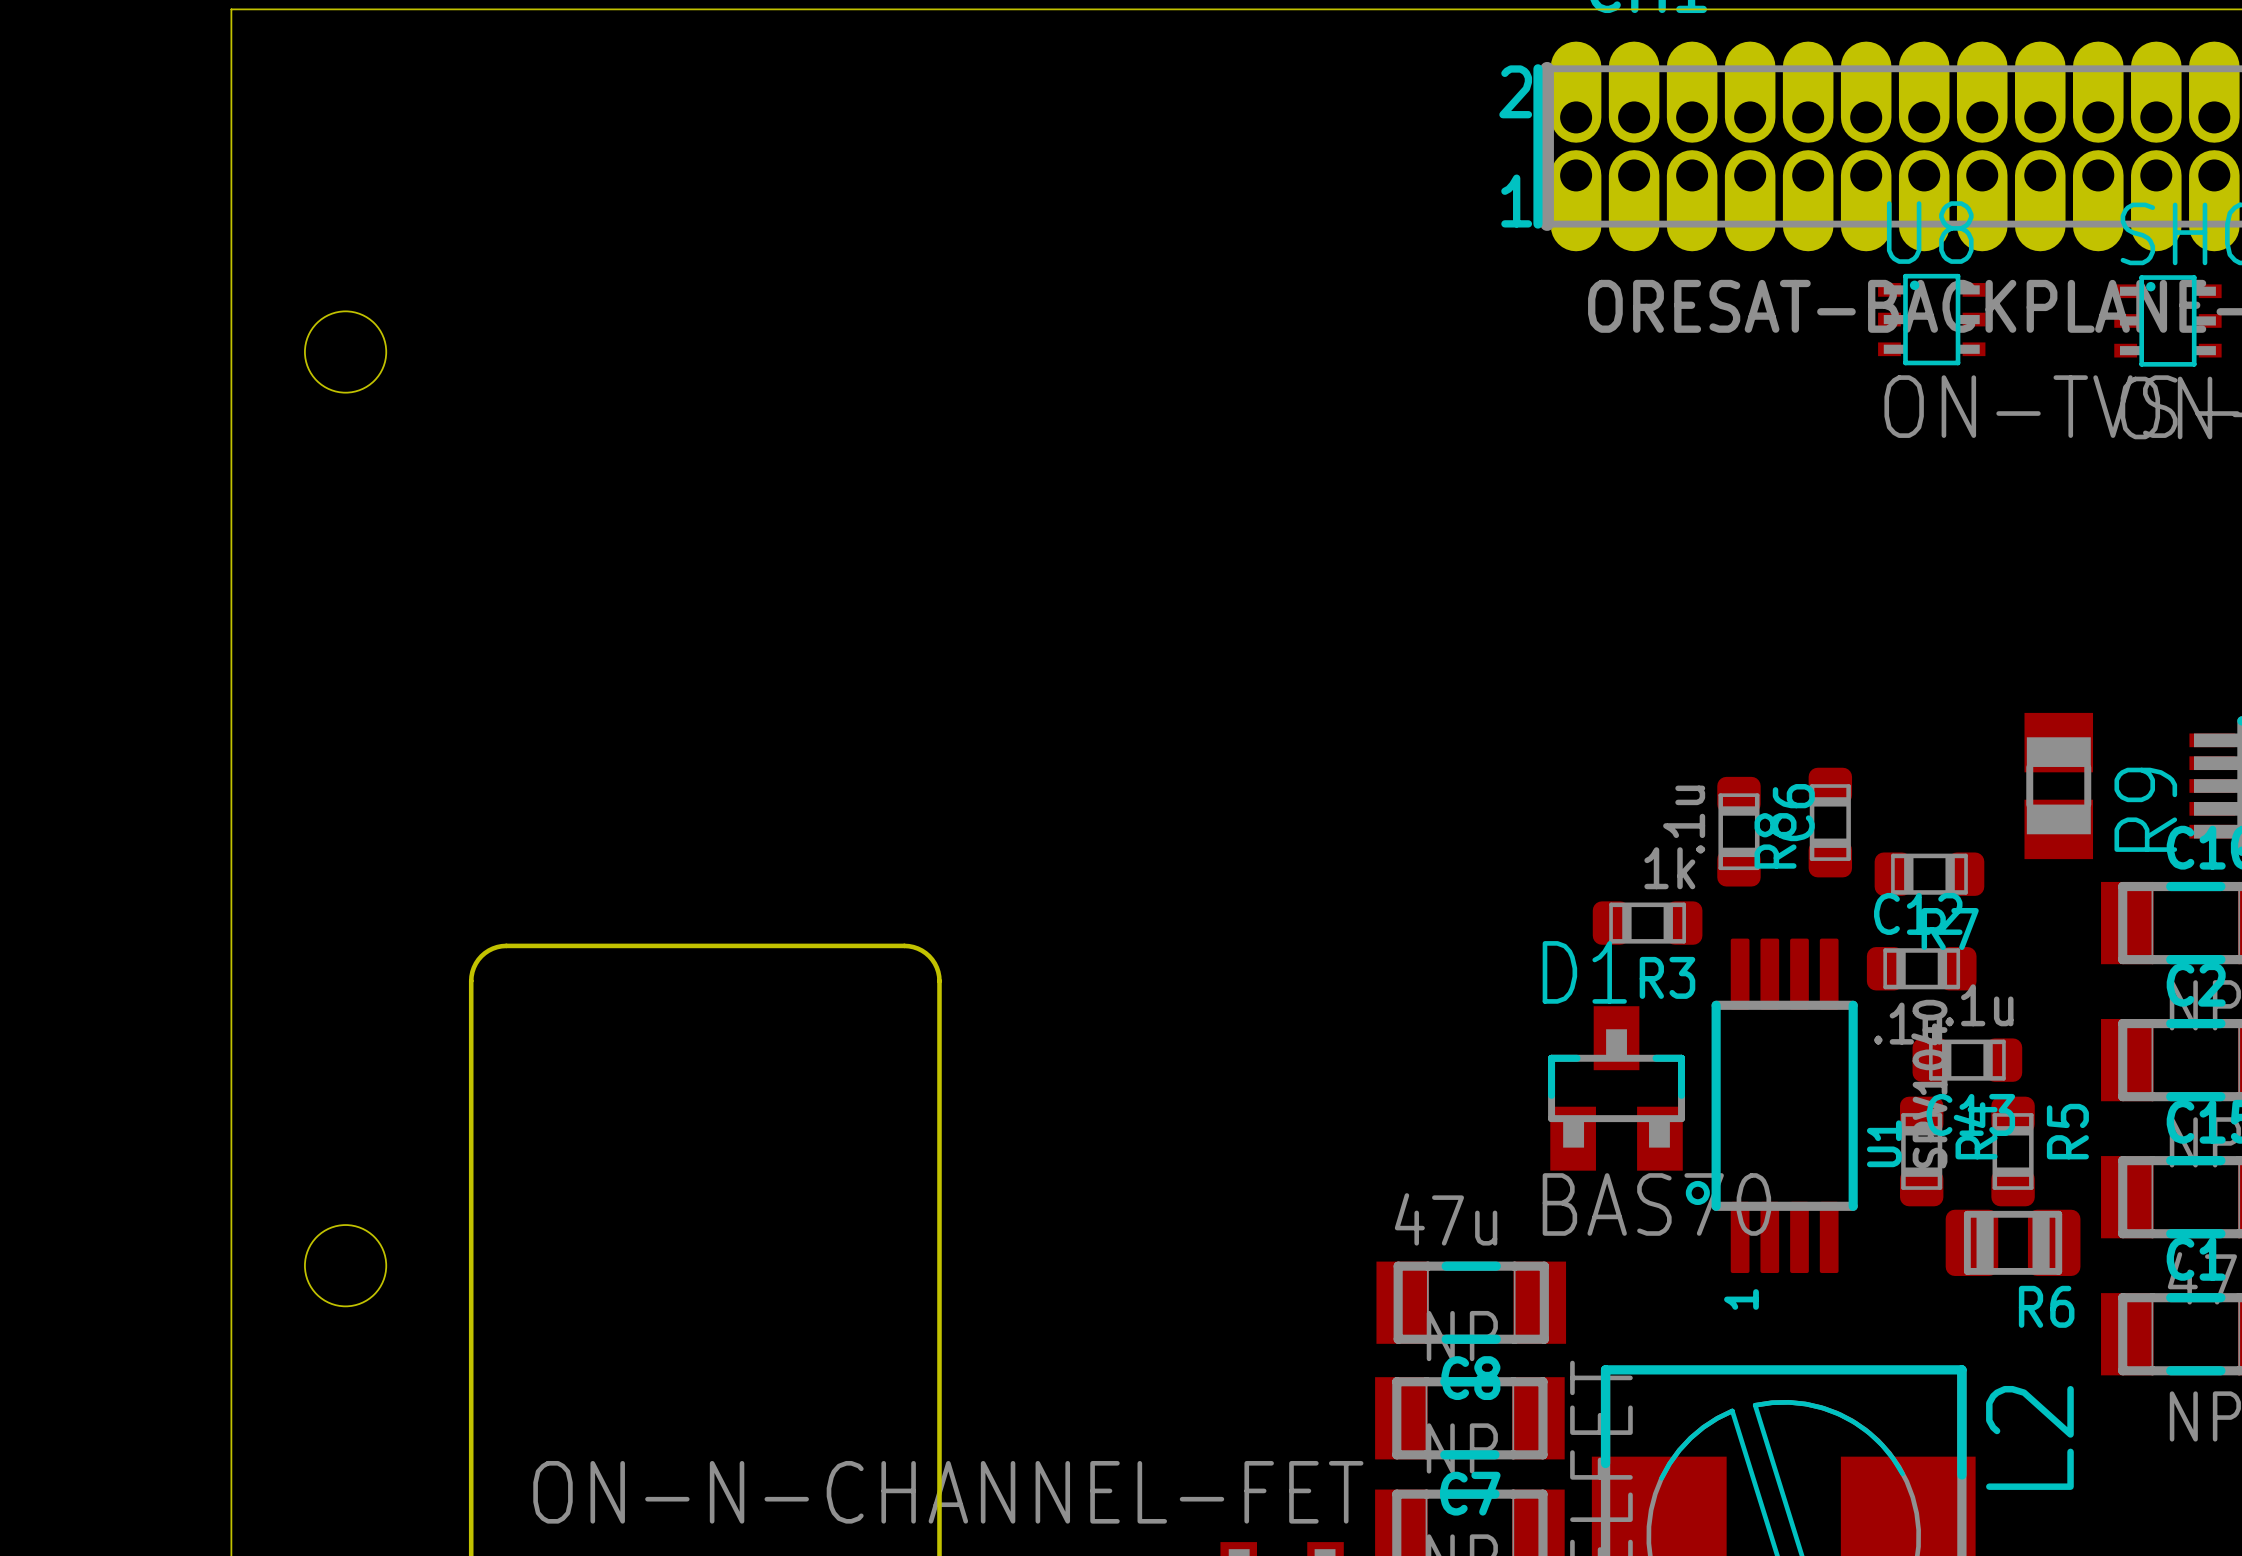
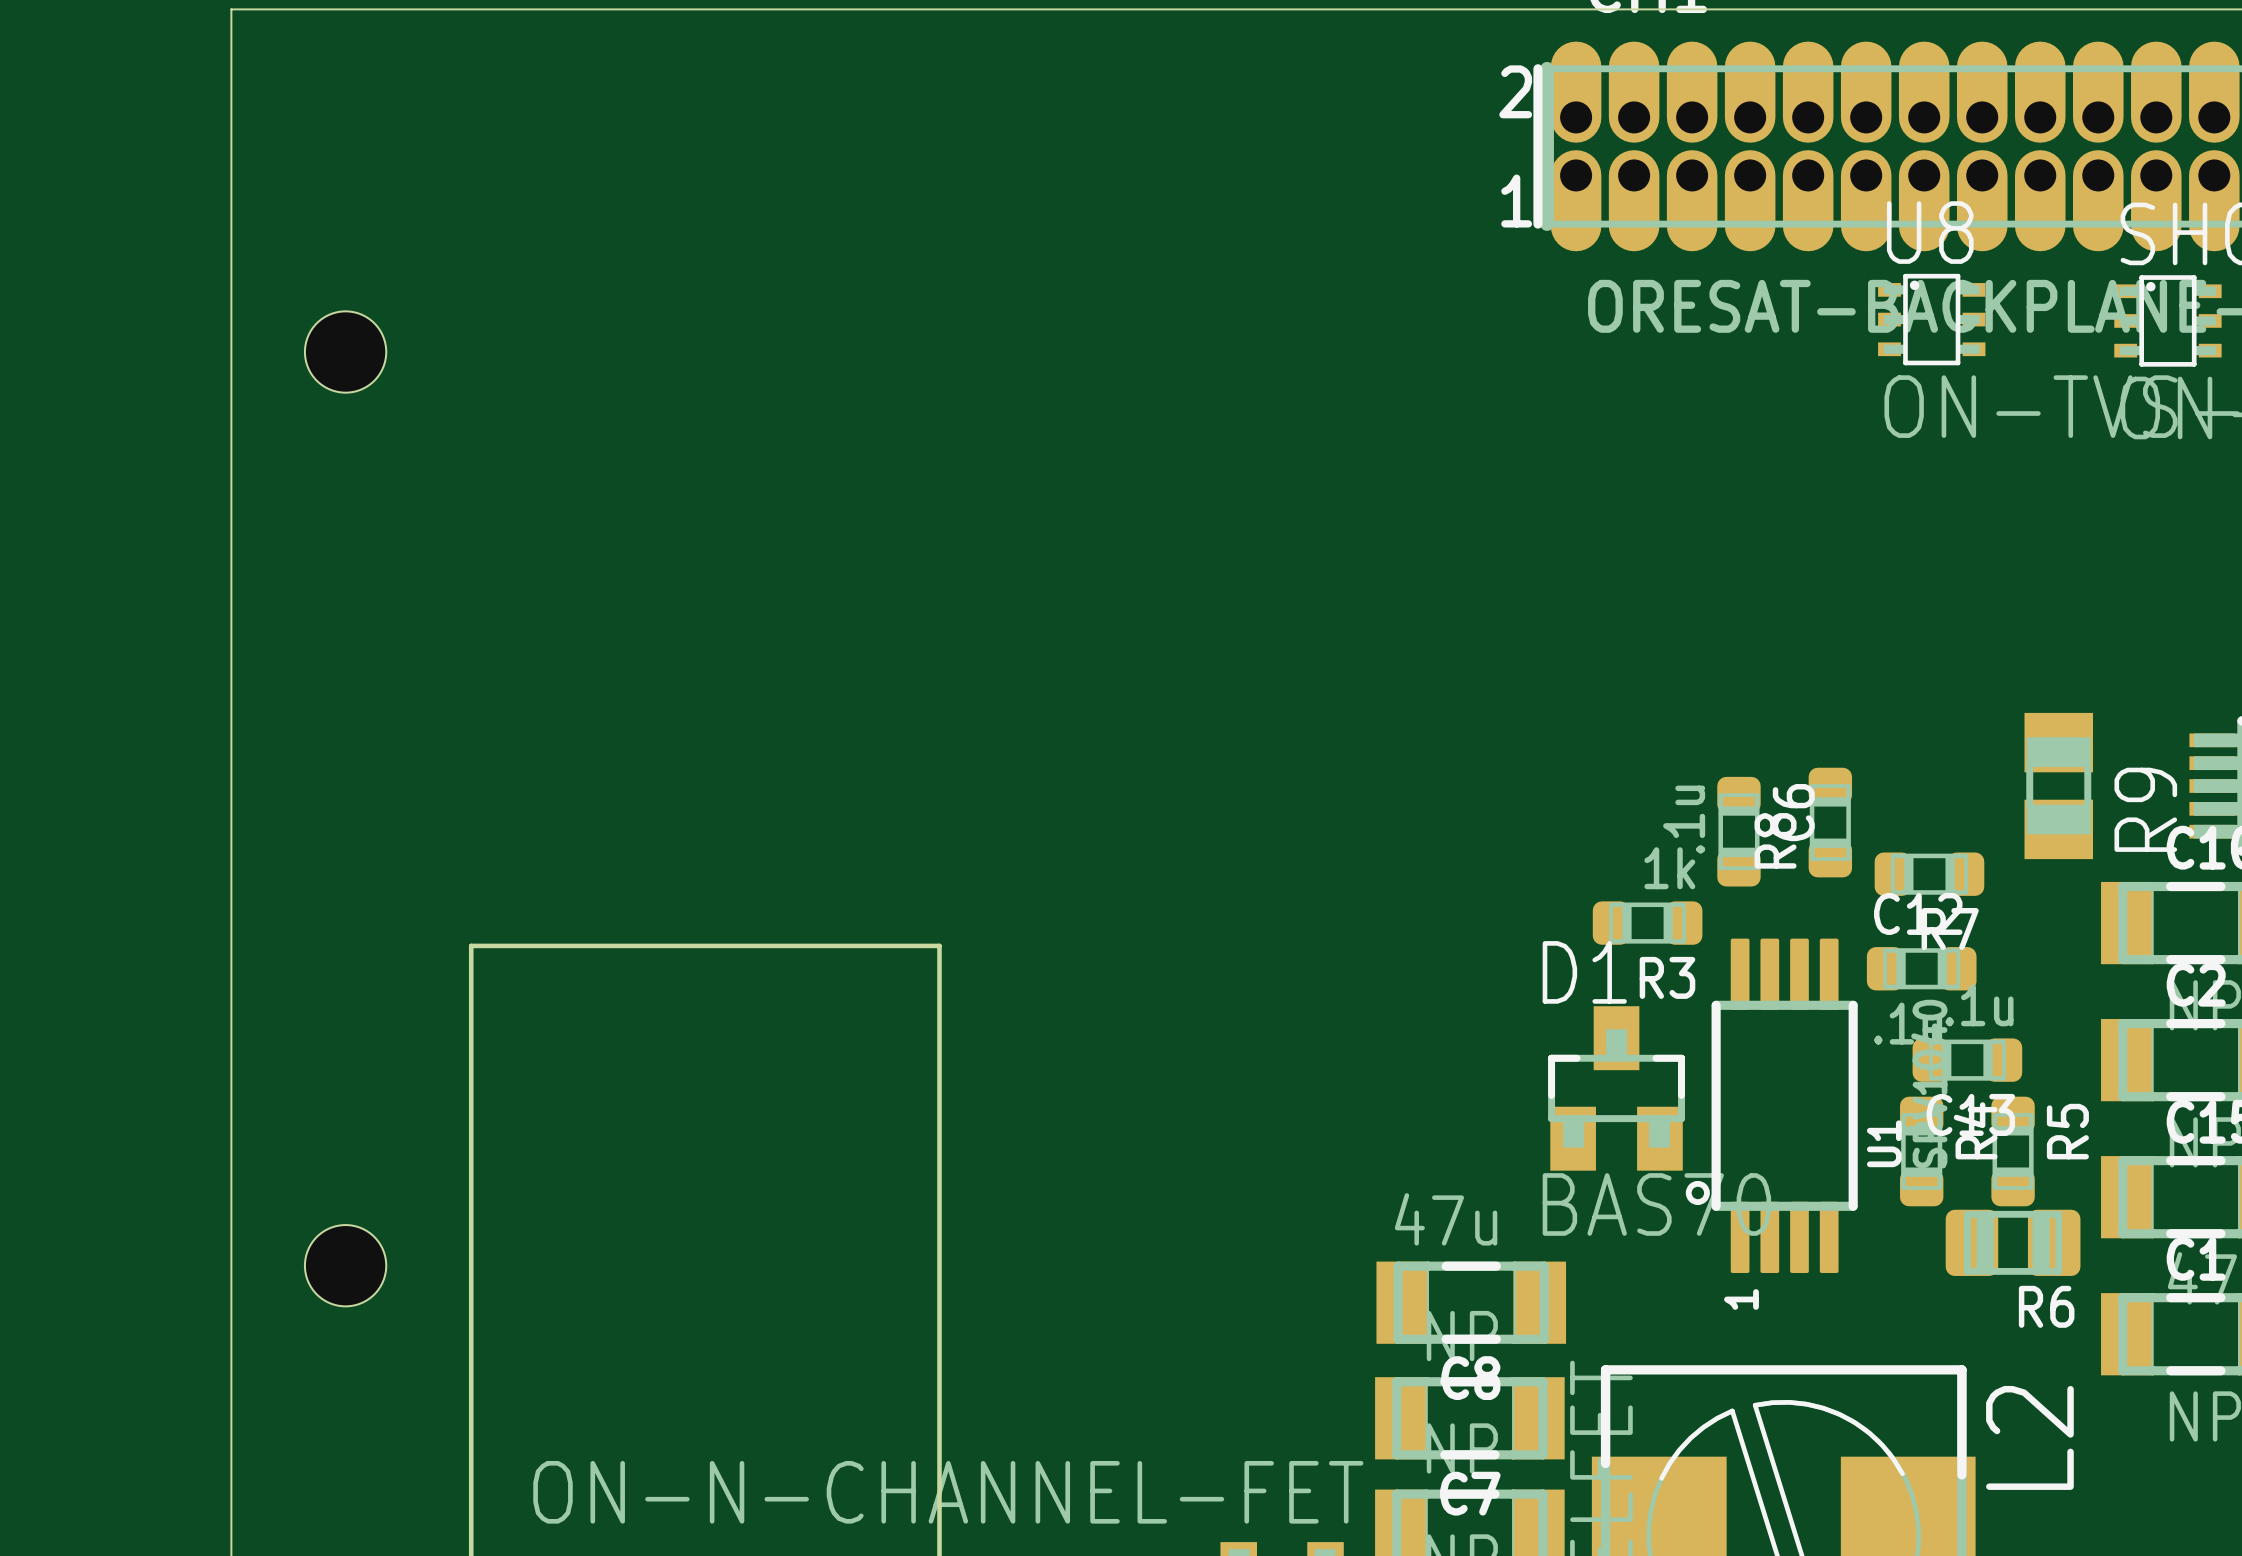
board edge: (506, 945) (492, 948) (481, 956) (473, 967) (471, 980) -> (506, 945) (471, 945) (471, 980)
board edge: (904, 945) (917, 948) (929, 956) (936, 967) (939, 980) -> (904, 945) (939, 945) (939, 980)

